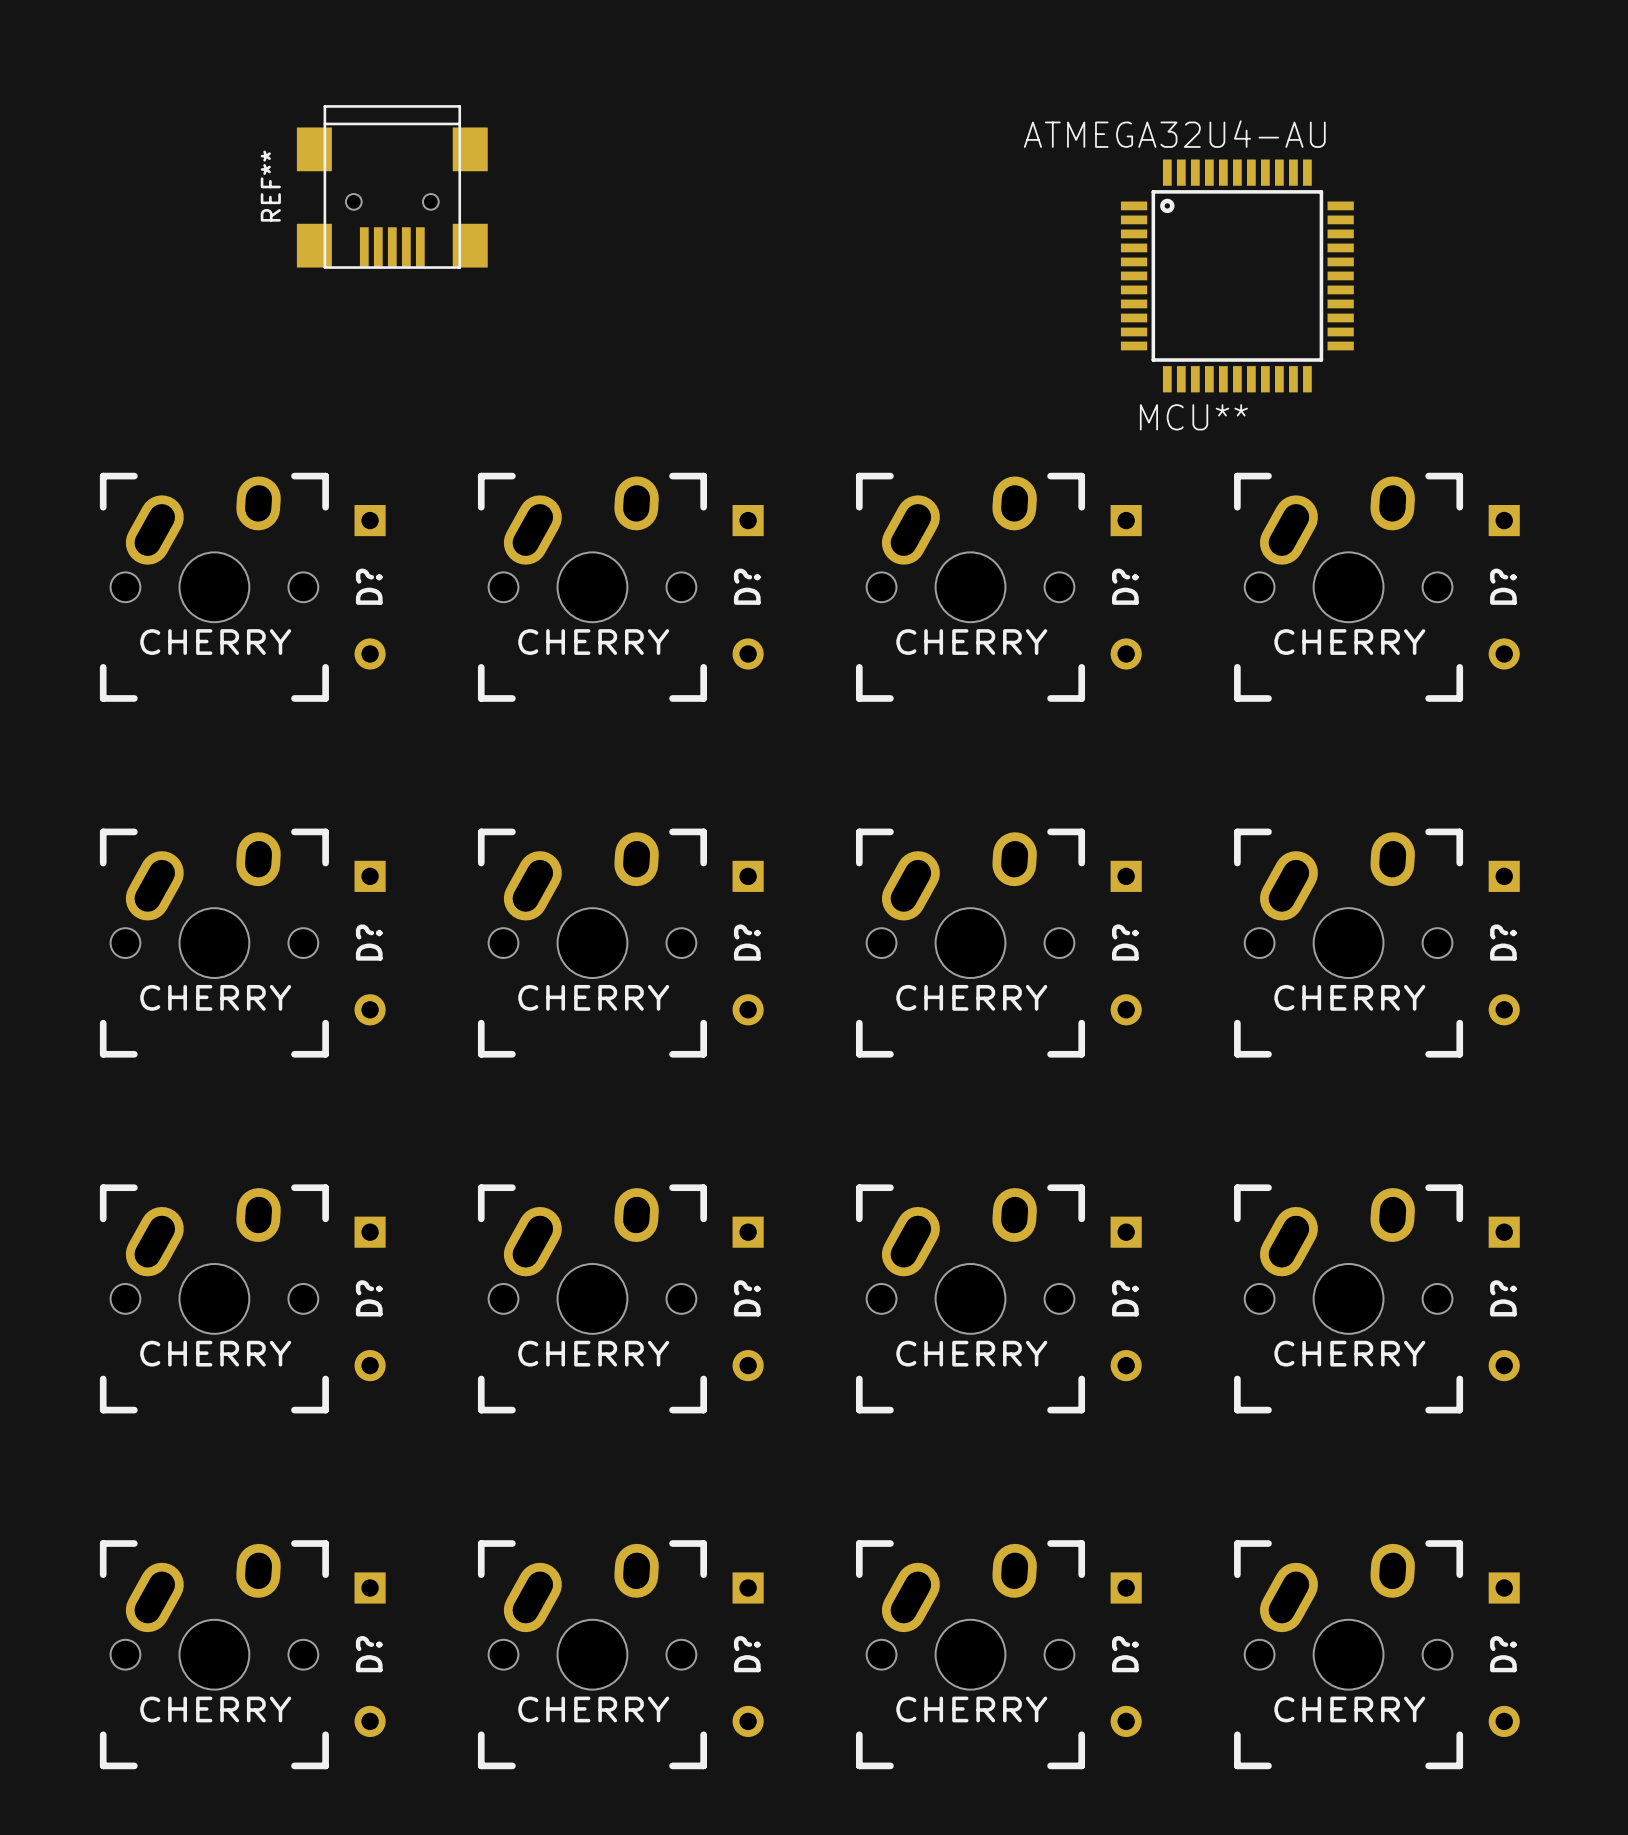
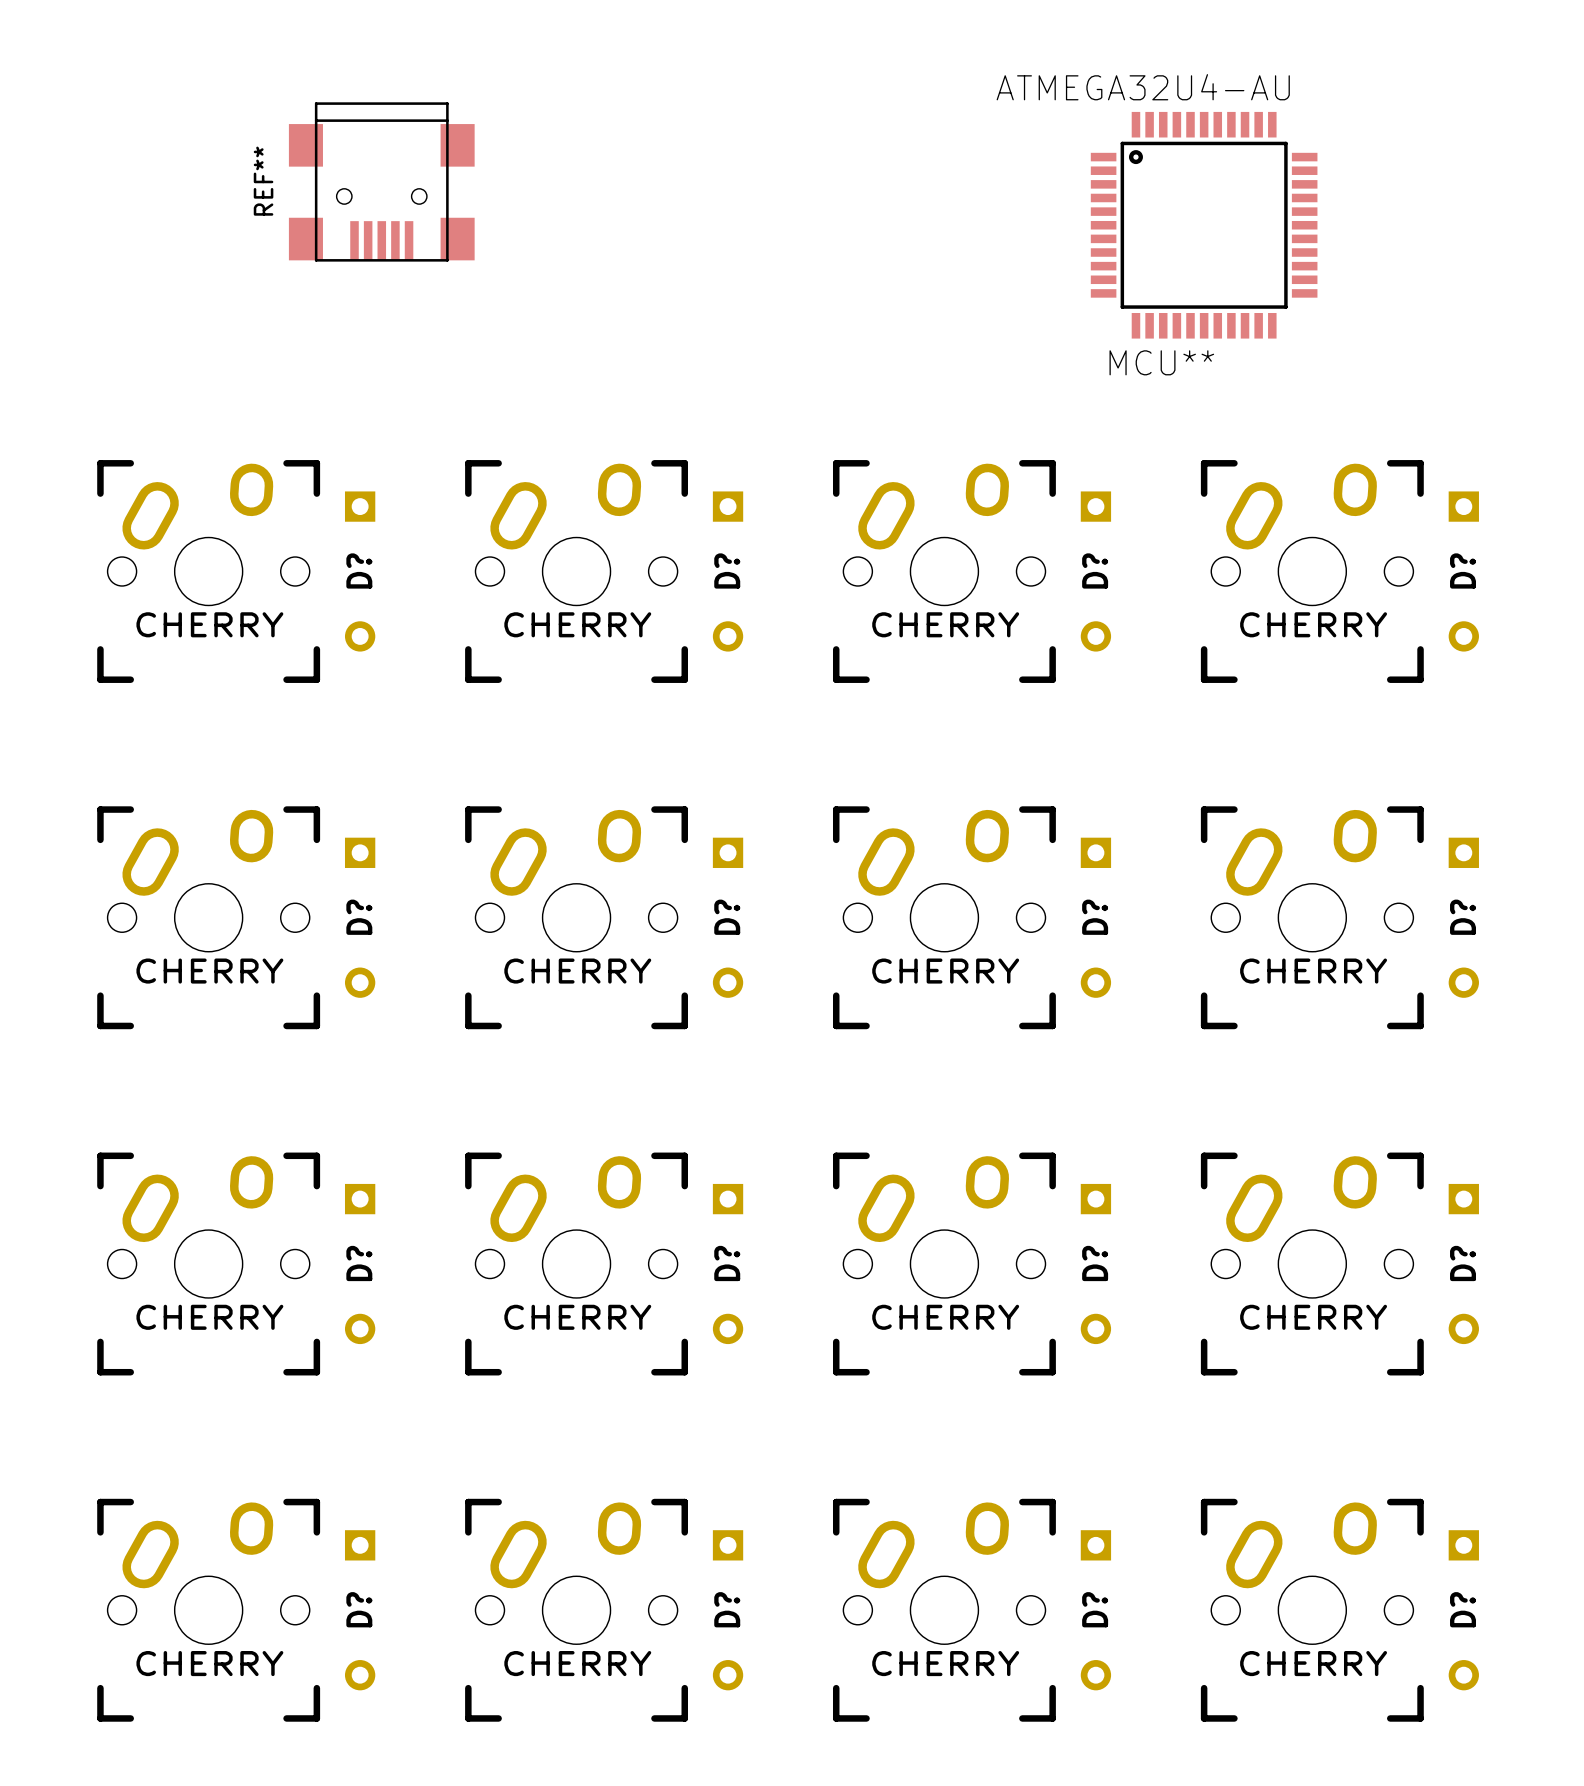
ATMEGA32U4-AU position: (1237, 275) -> (1204, 225)

